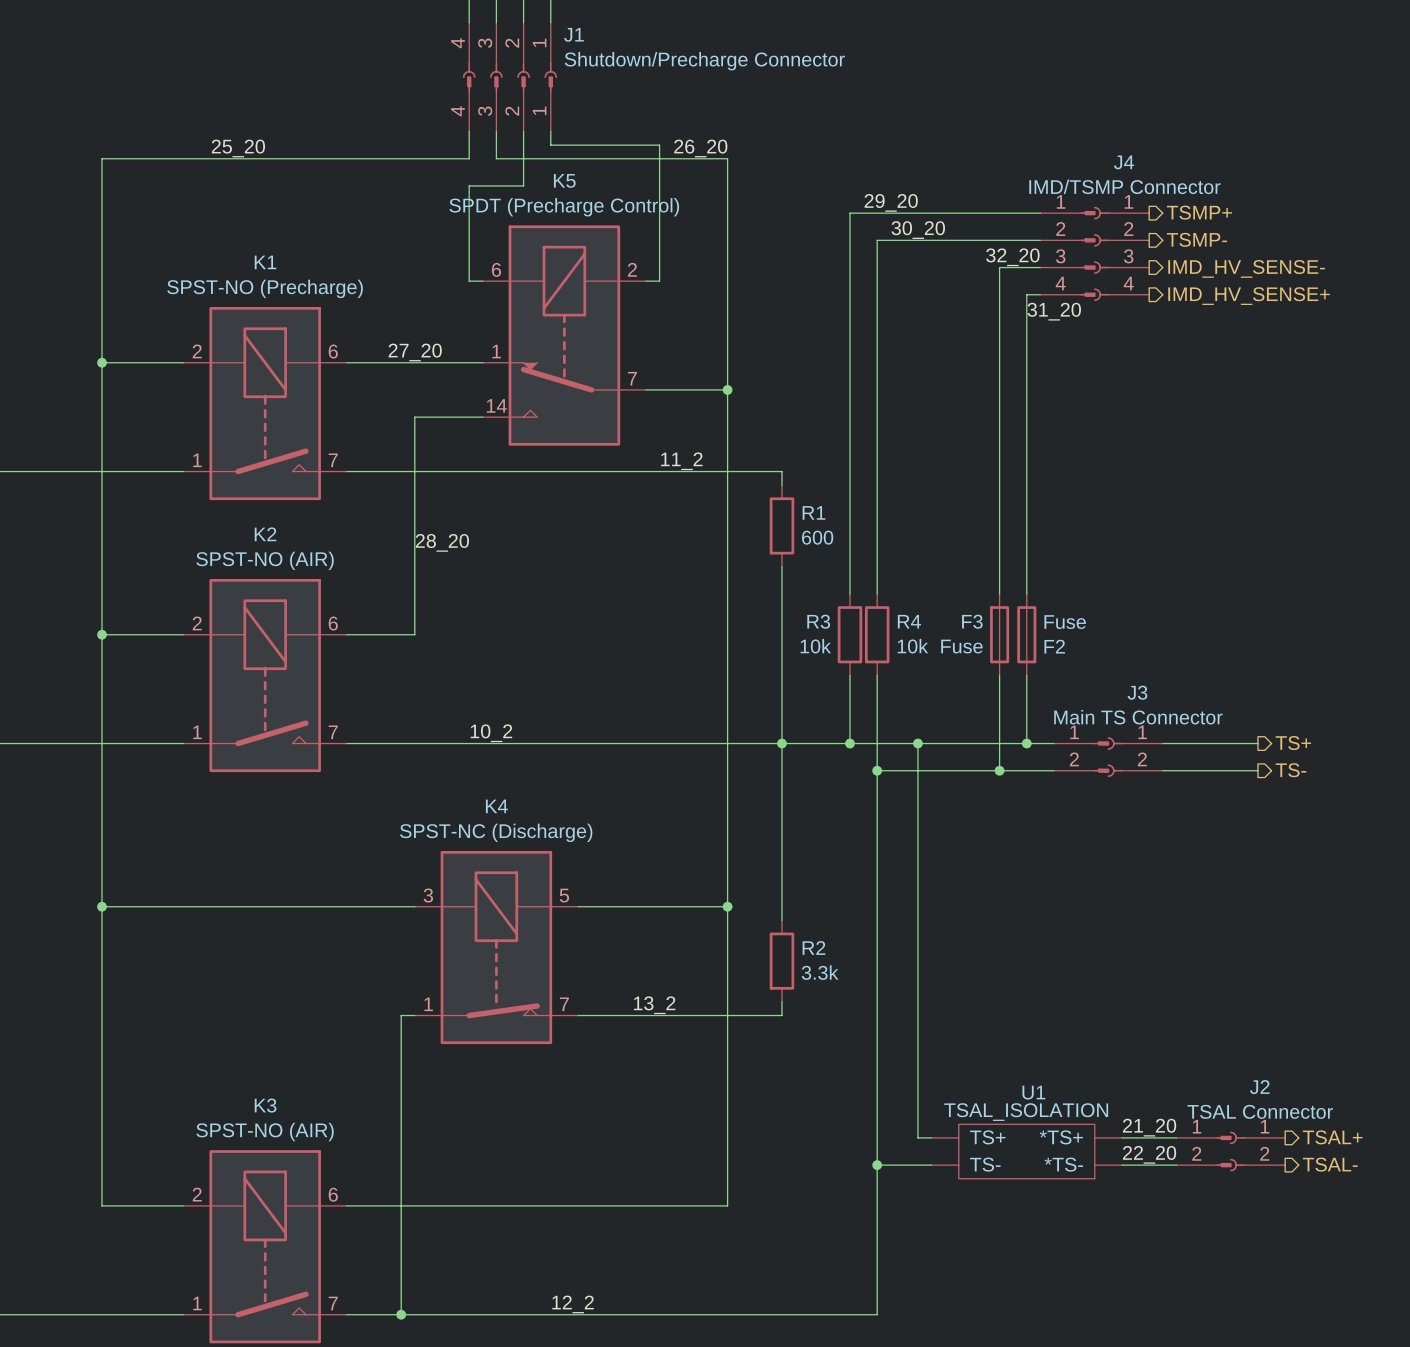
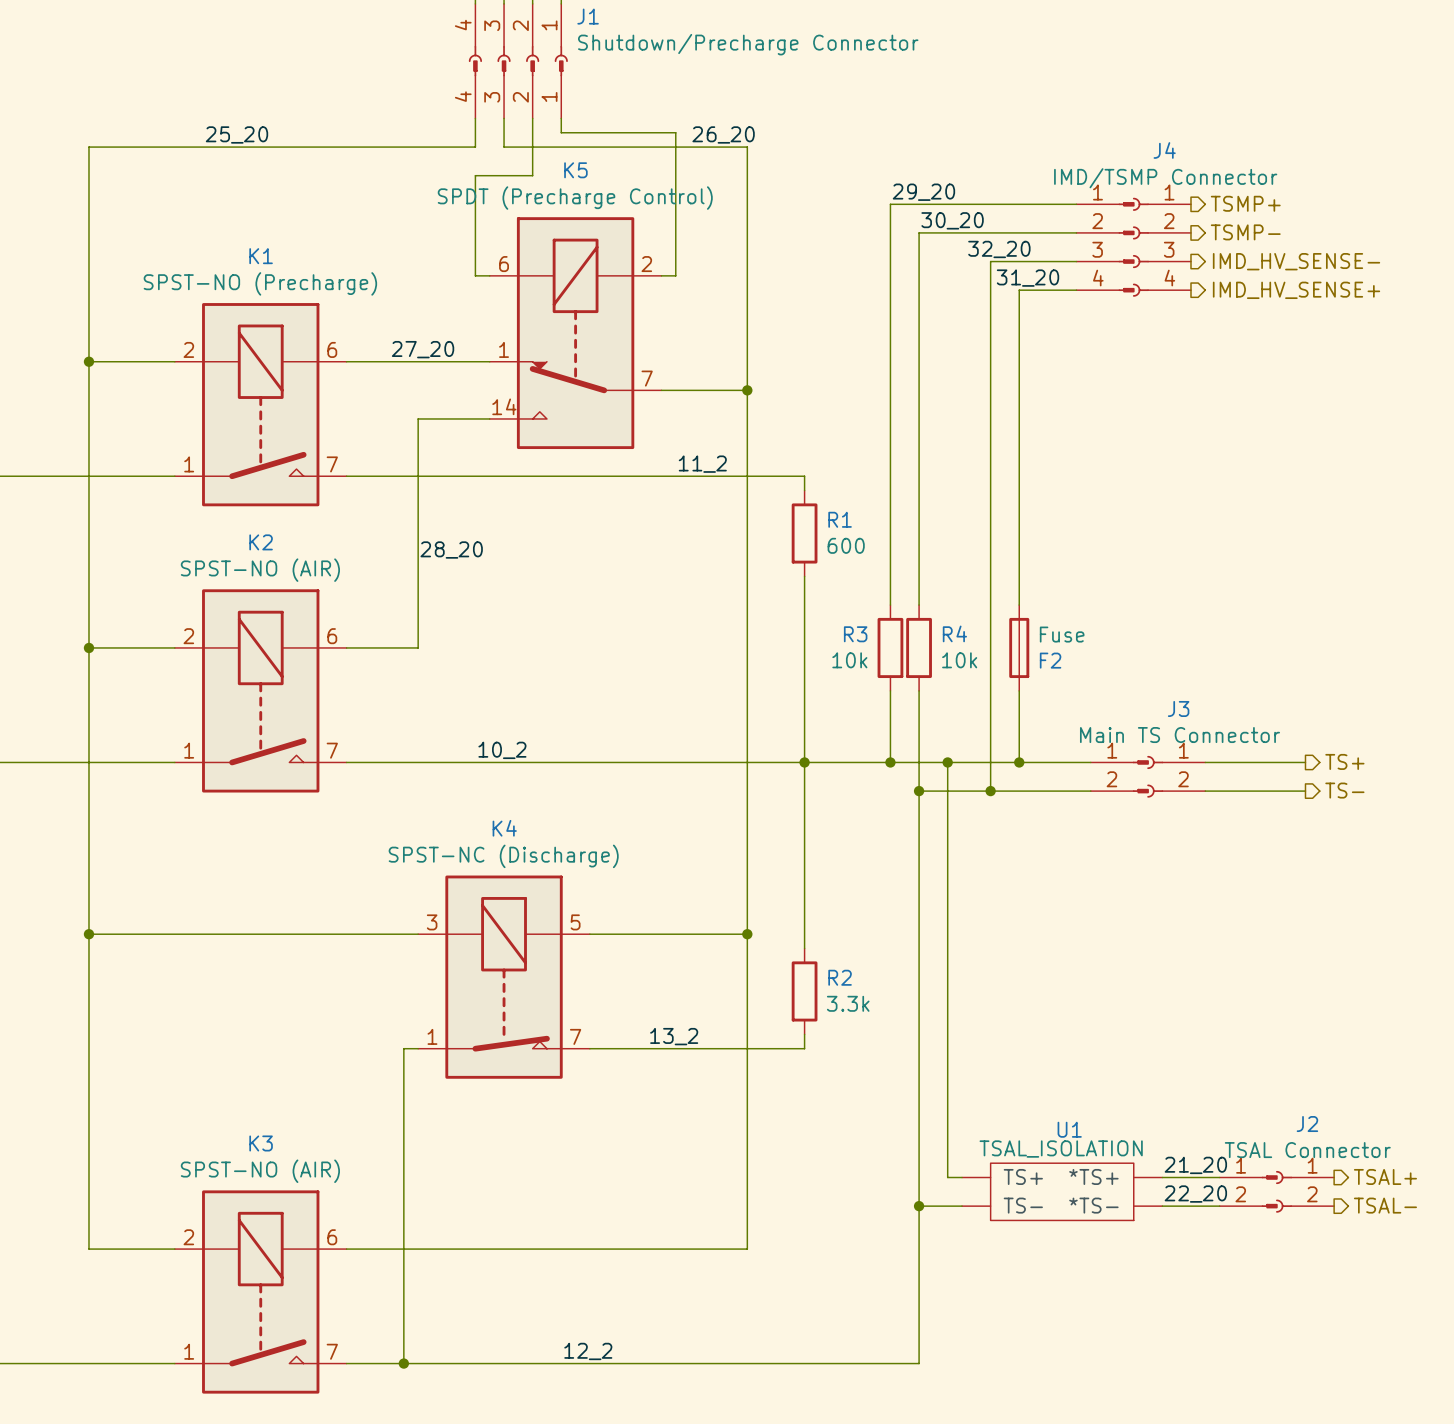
wire: (863, 213) (849, 213) (849, 593) -> (890, 204) (890, 605)
wire: (890, 240) (877, 240) (877, 593) -> (919, 232) (919, 605)
label position: 32_20 (1012, 257) -> 32_20 (999, 249)
wire: (999, 267) (999, 593) -> (1033, 261) (990, 261) (990, 791)
wire: (1026, 294) (1026, 593) -> (1062, 290) (1019, 290) (1019, 605)
label position: 31_20 (1054, 311) -> 31_20 (1028, 278)
R3 position: (849, 634) -> (890, 647)
R4 position: (877, 634) -> (919, 647)
F3: Fuse (999, 634) -> none
F2 position: (1026, 634) -> (1019, 647)
wire: (849, 675) (849, 743) -> (890, 690) (890, 762)
wire: (877, 675) (877, 1314) -> (919, 690) (919, 1363) (904, 1363)
wire: (999, 675) (999, 770) -> none
wire: (1026, 675) (1026, 743) -> (1019, 690) (1019, 762)
junction position: (849, 743) -> (890, 762)
junction: none -> (1019, 762)
junction: (1026, 743) -> none
wire: (877, 770) (890, 770) -> none
junction position: (877, 770) -> (919, 791)
junction: none -> (990, 791)
junction: (999, 770) -> none
wire: (877, 1165) (890, 1165) -> none
junction position: (877, 1165) -> (919, 1206)

